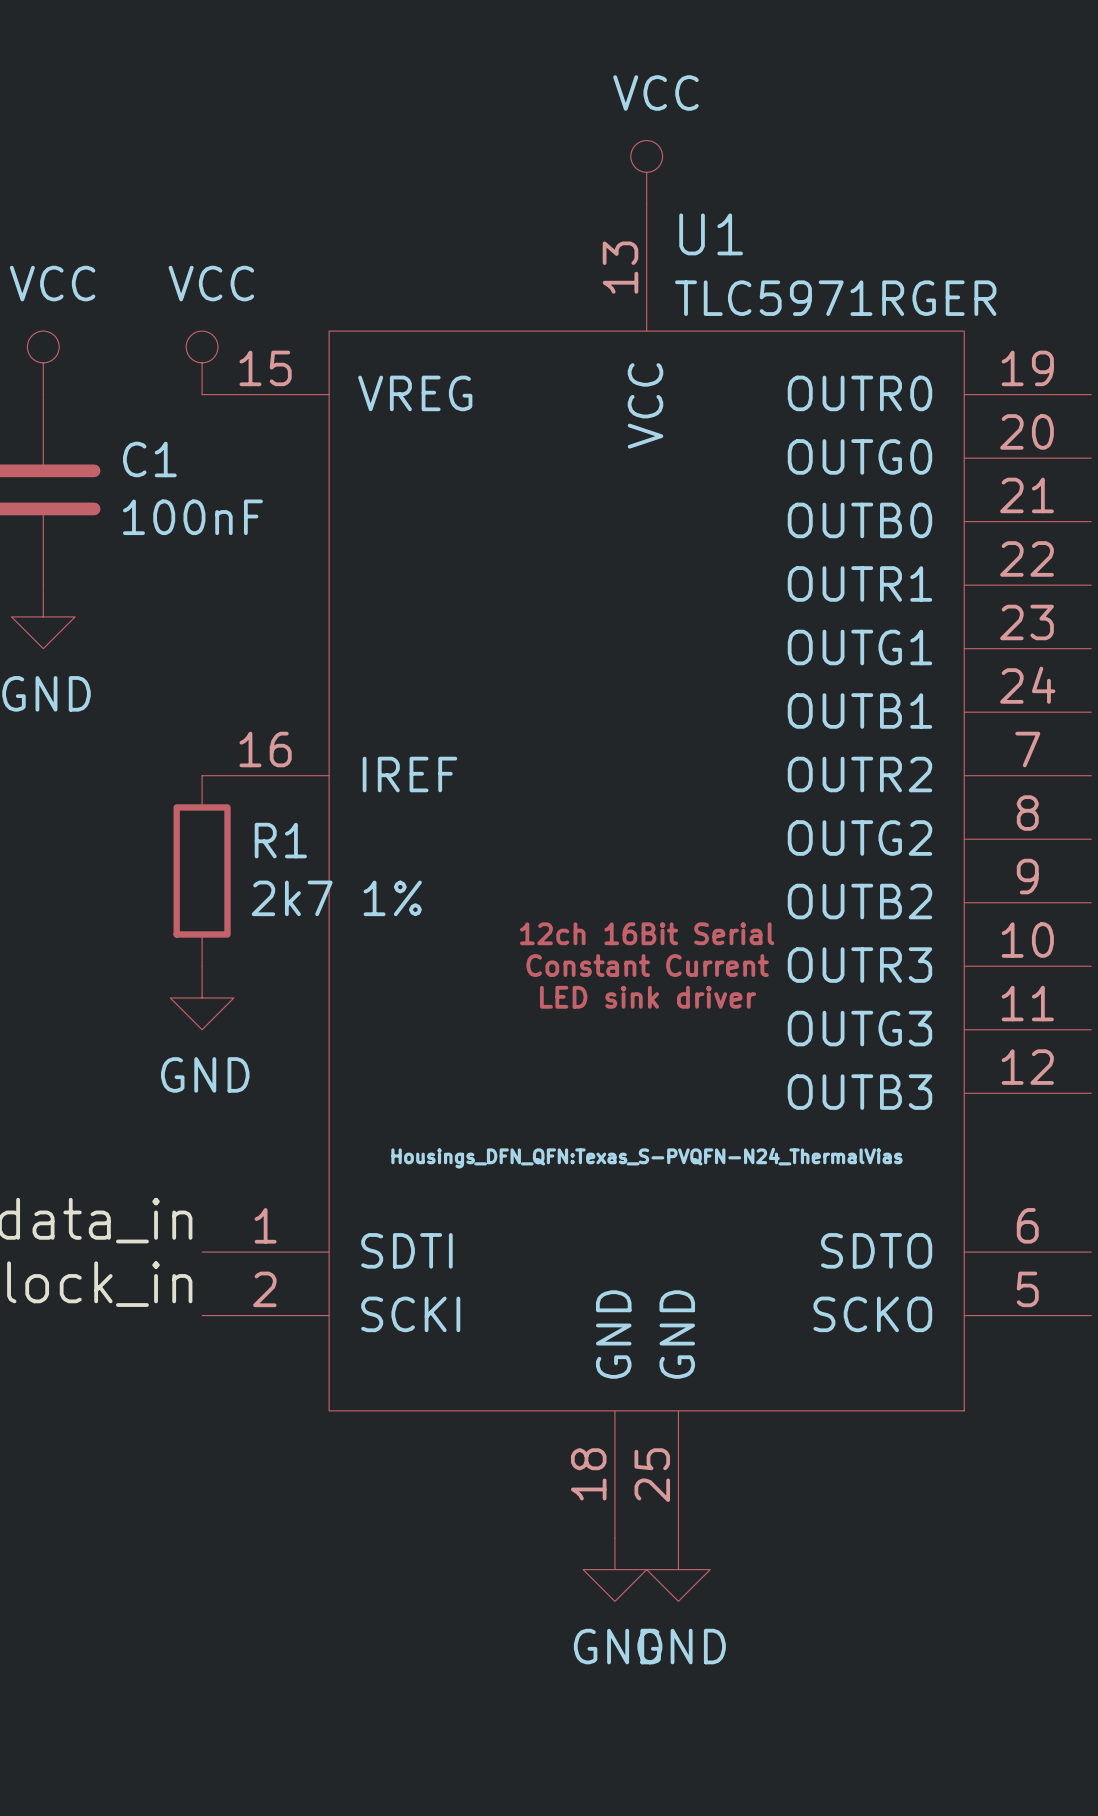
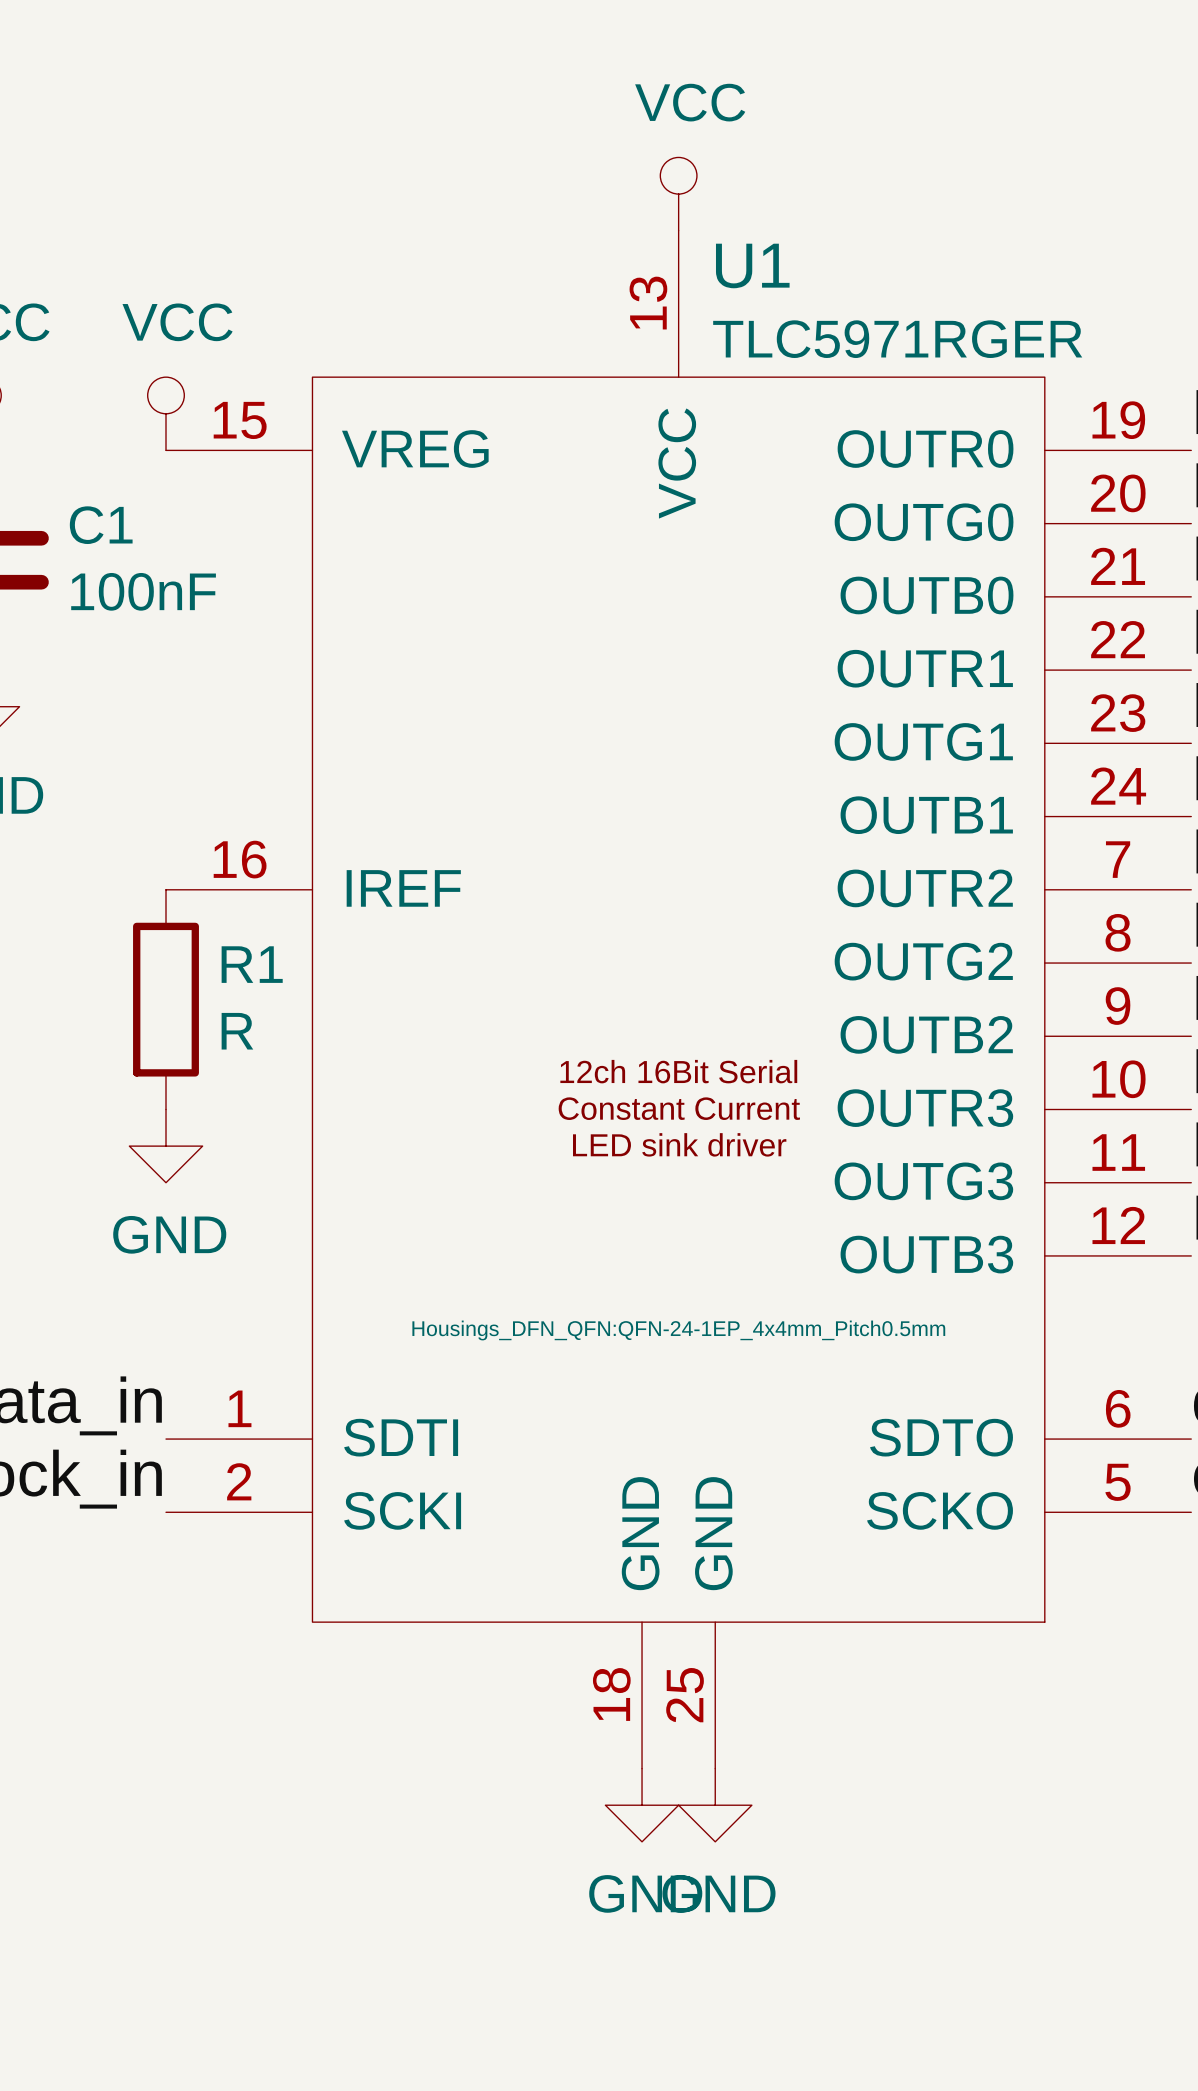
R1 value: 2k7 1% (336, 898) -> R (237, 1031)
U1 text: Housings_DFN_QFN:Texas_S-PVQFN-N24_ThermalVias (646, 1158) -> Housings_DFN_QFN:QFN-24-1EP_4x4mm_Pitch0.5mm (678, 1330)

